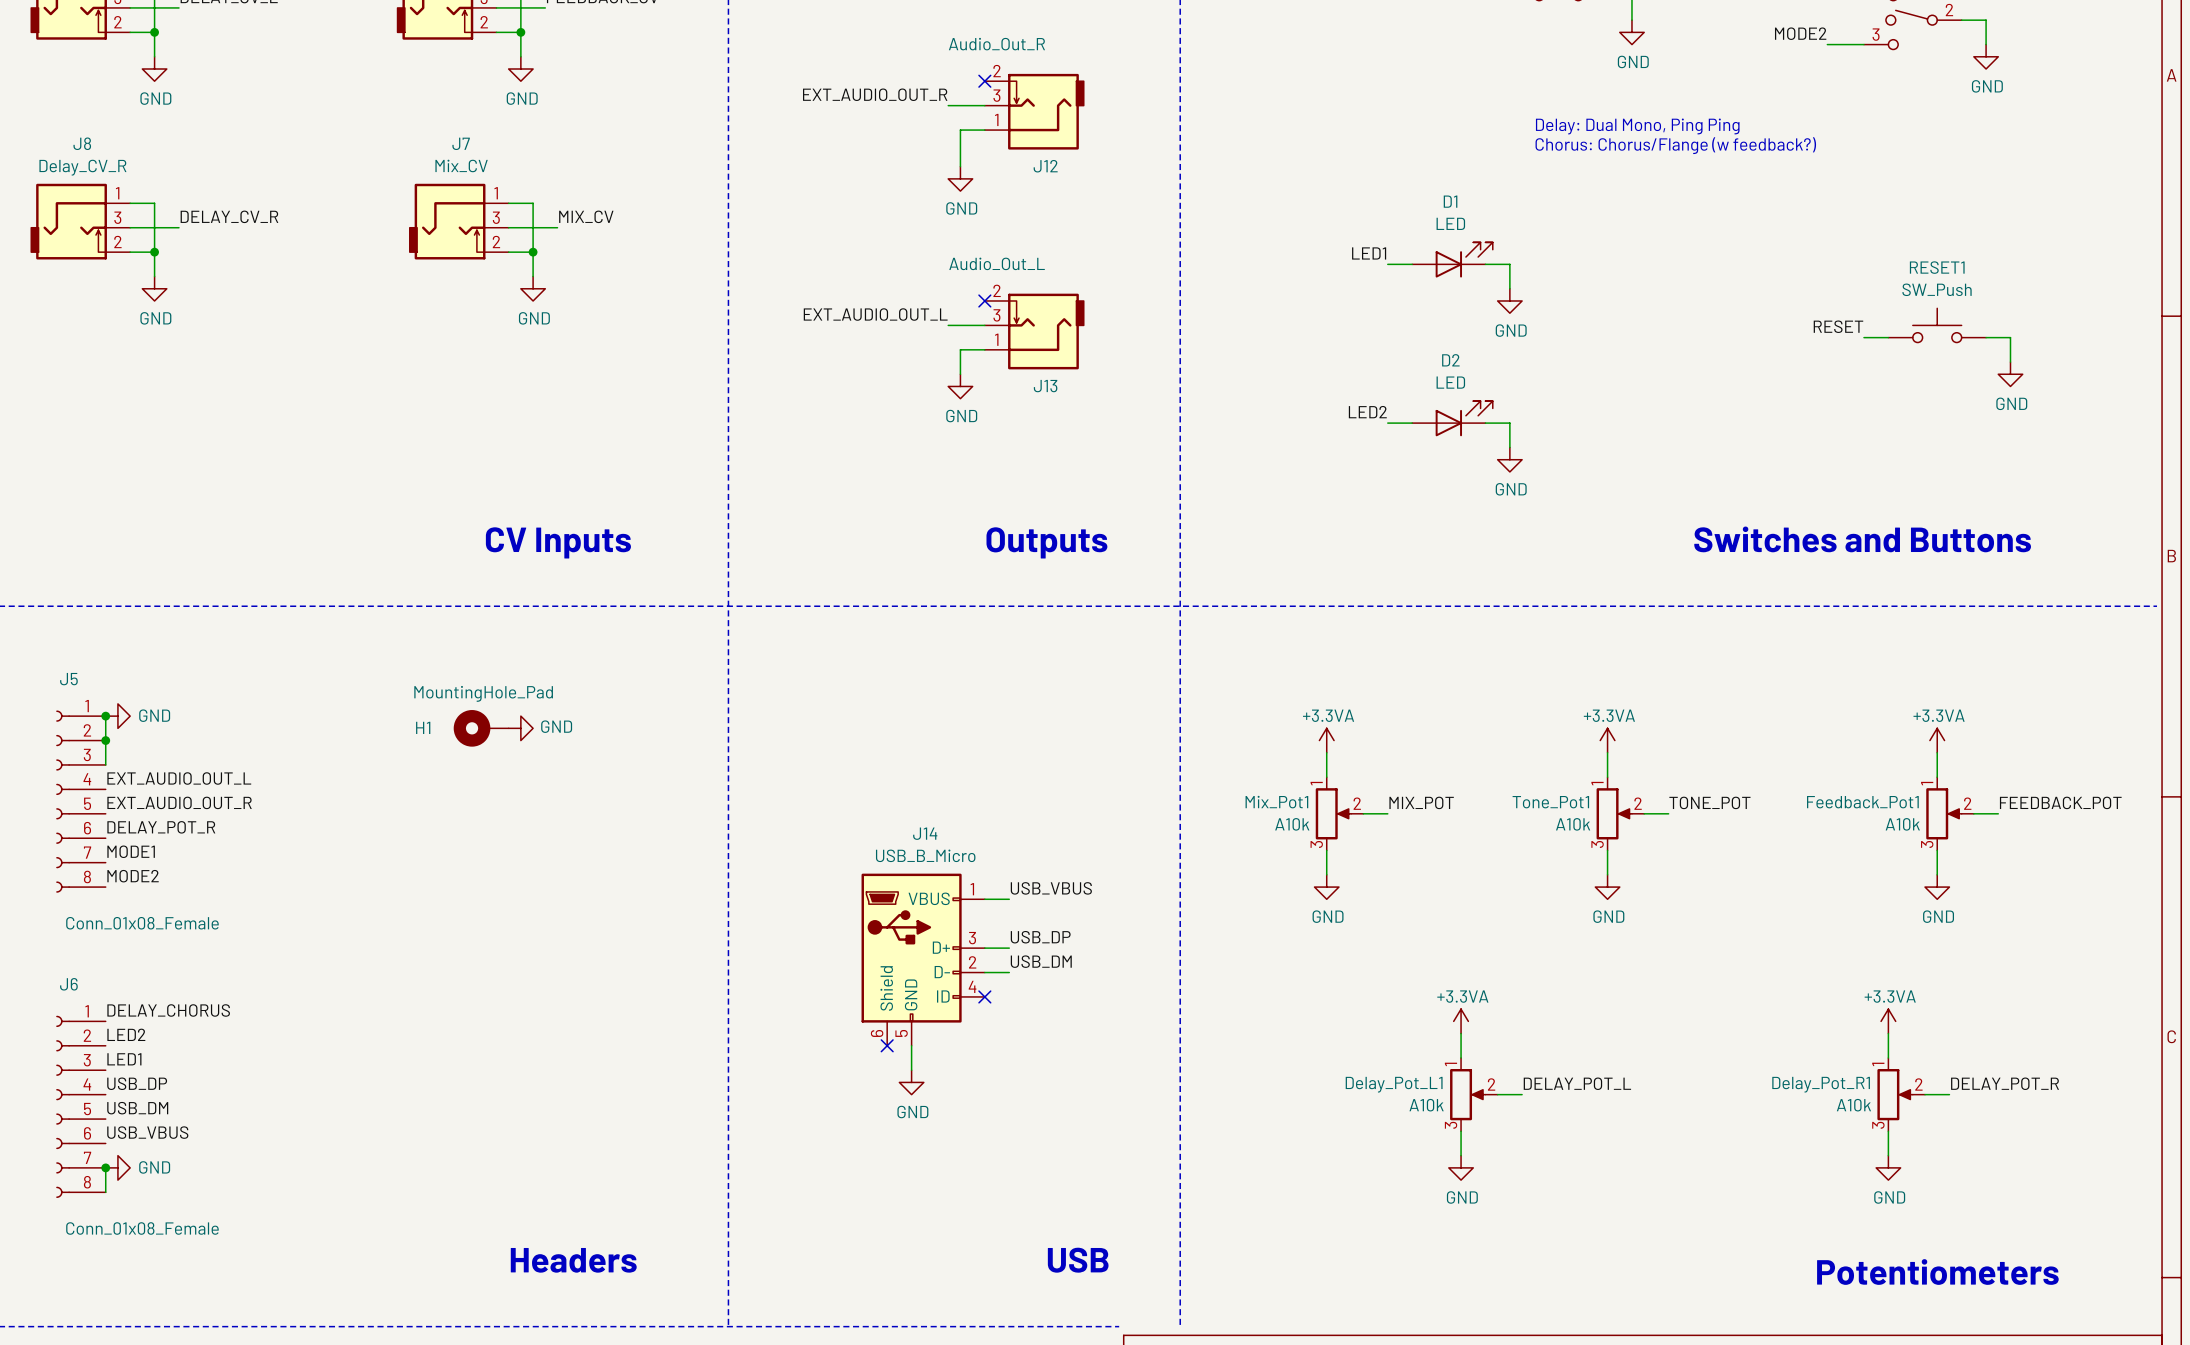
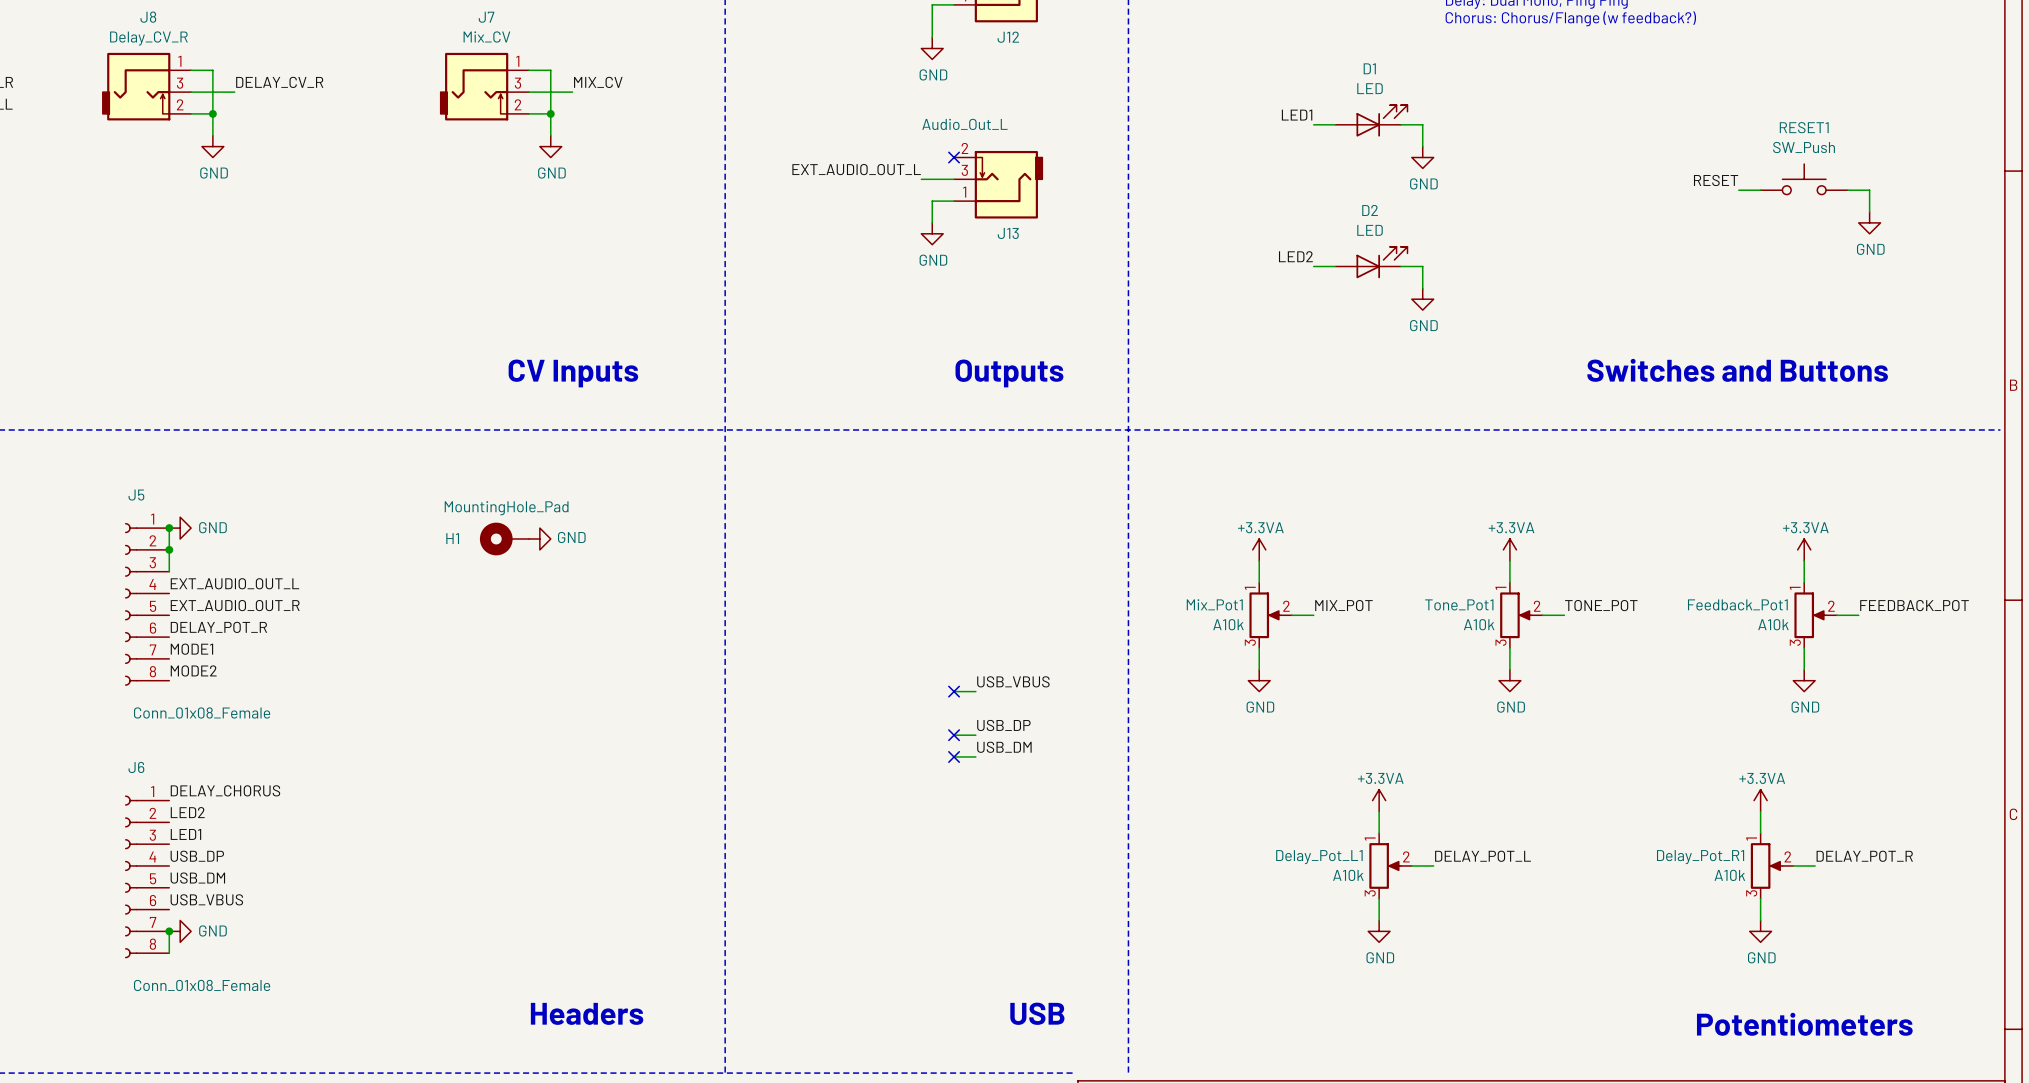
no-connect mark: none -> (954, 691)
no-connect mark: none -> (954, 735)
J14: USB_B_Micro (923, 959) -> none
no-connect mark: none -> (954, 756)
no-connect mark: (984, 996) -> none
no-connect mark: (887, 1045) -> none
wire: (911, 1045) (911, 1070) -> none
power symbol: GND (911, 1082) -> none

